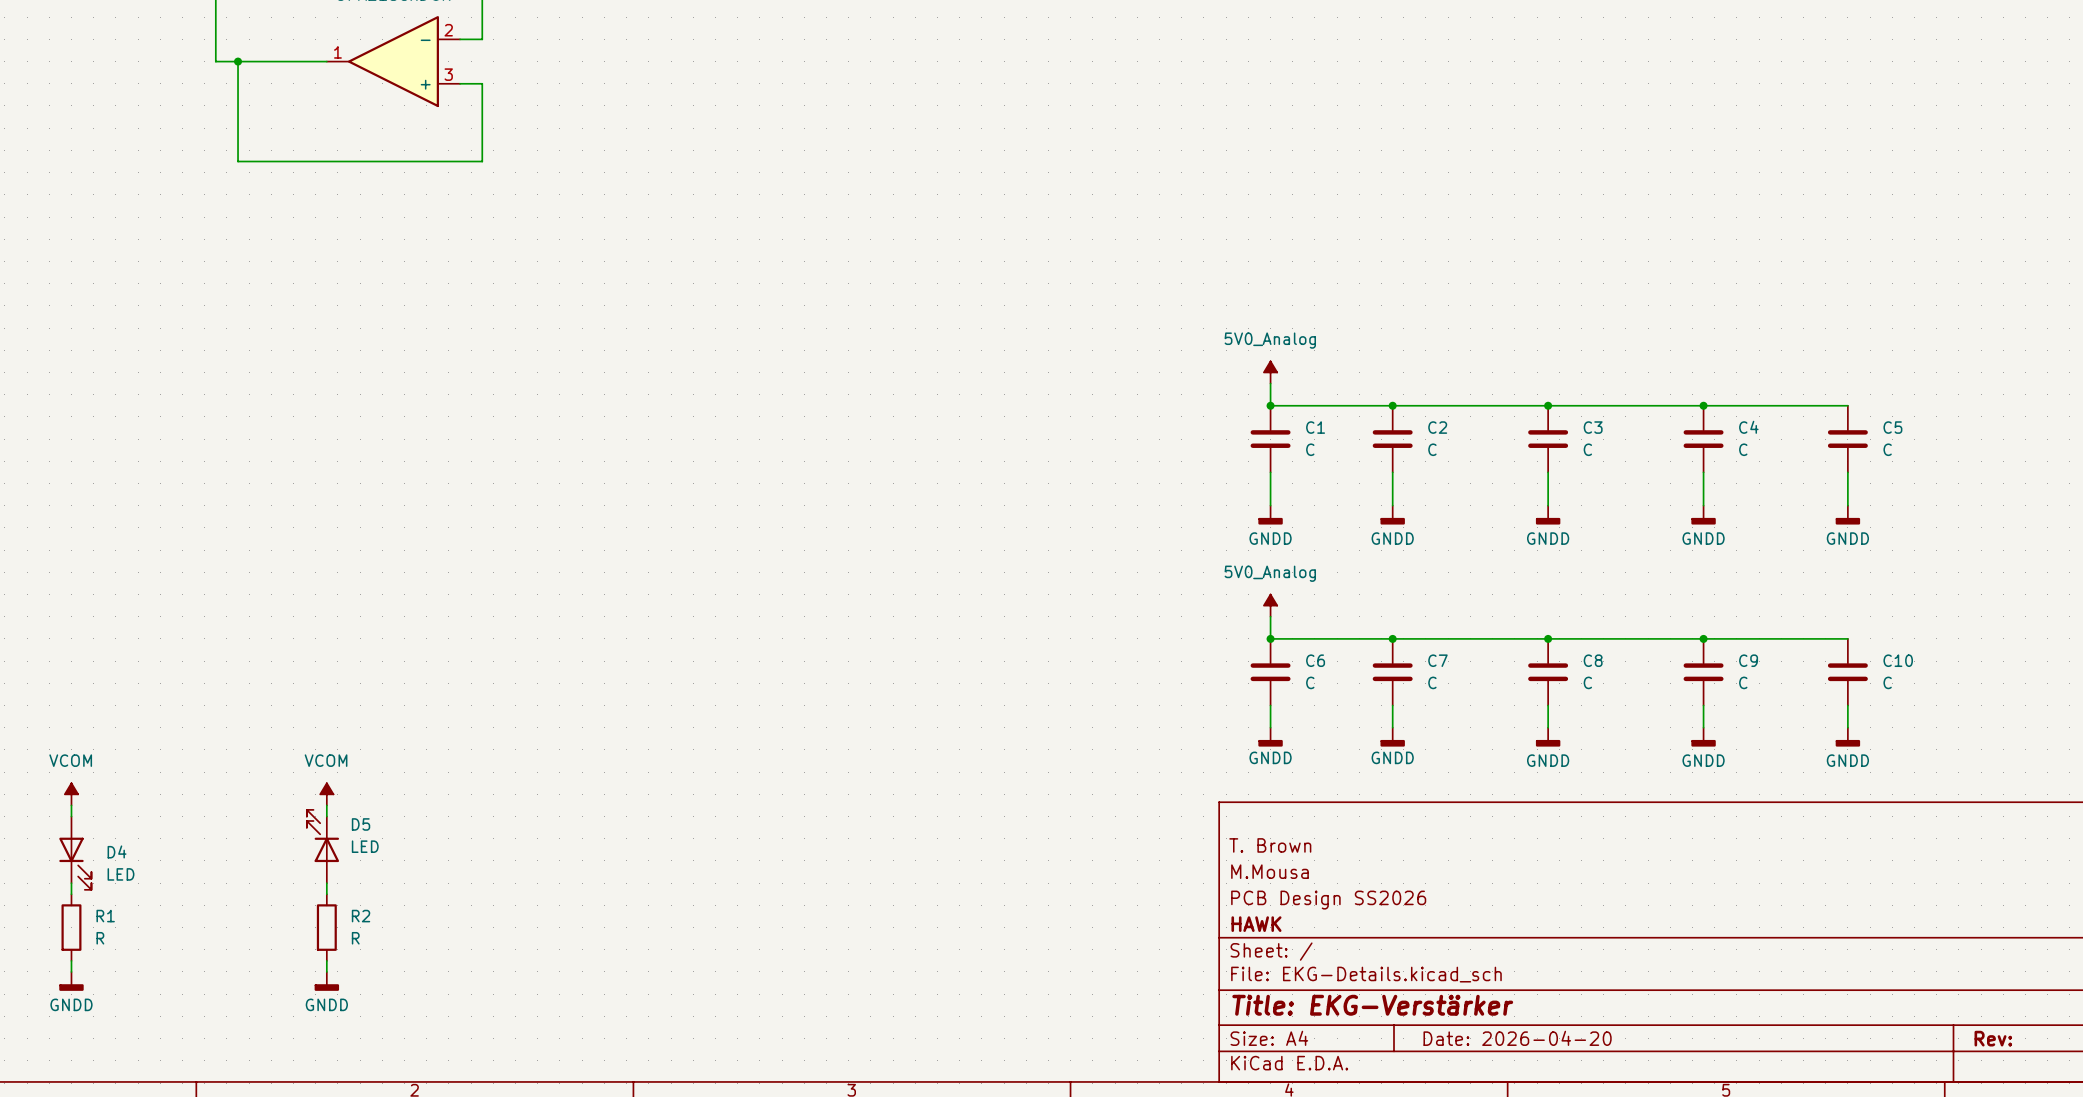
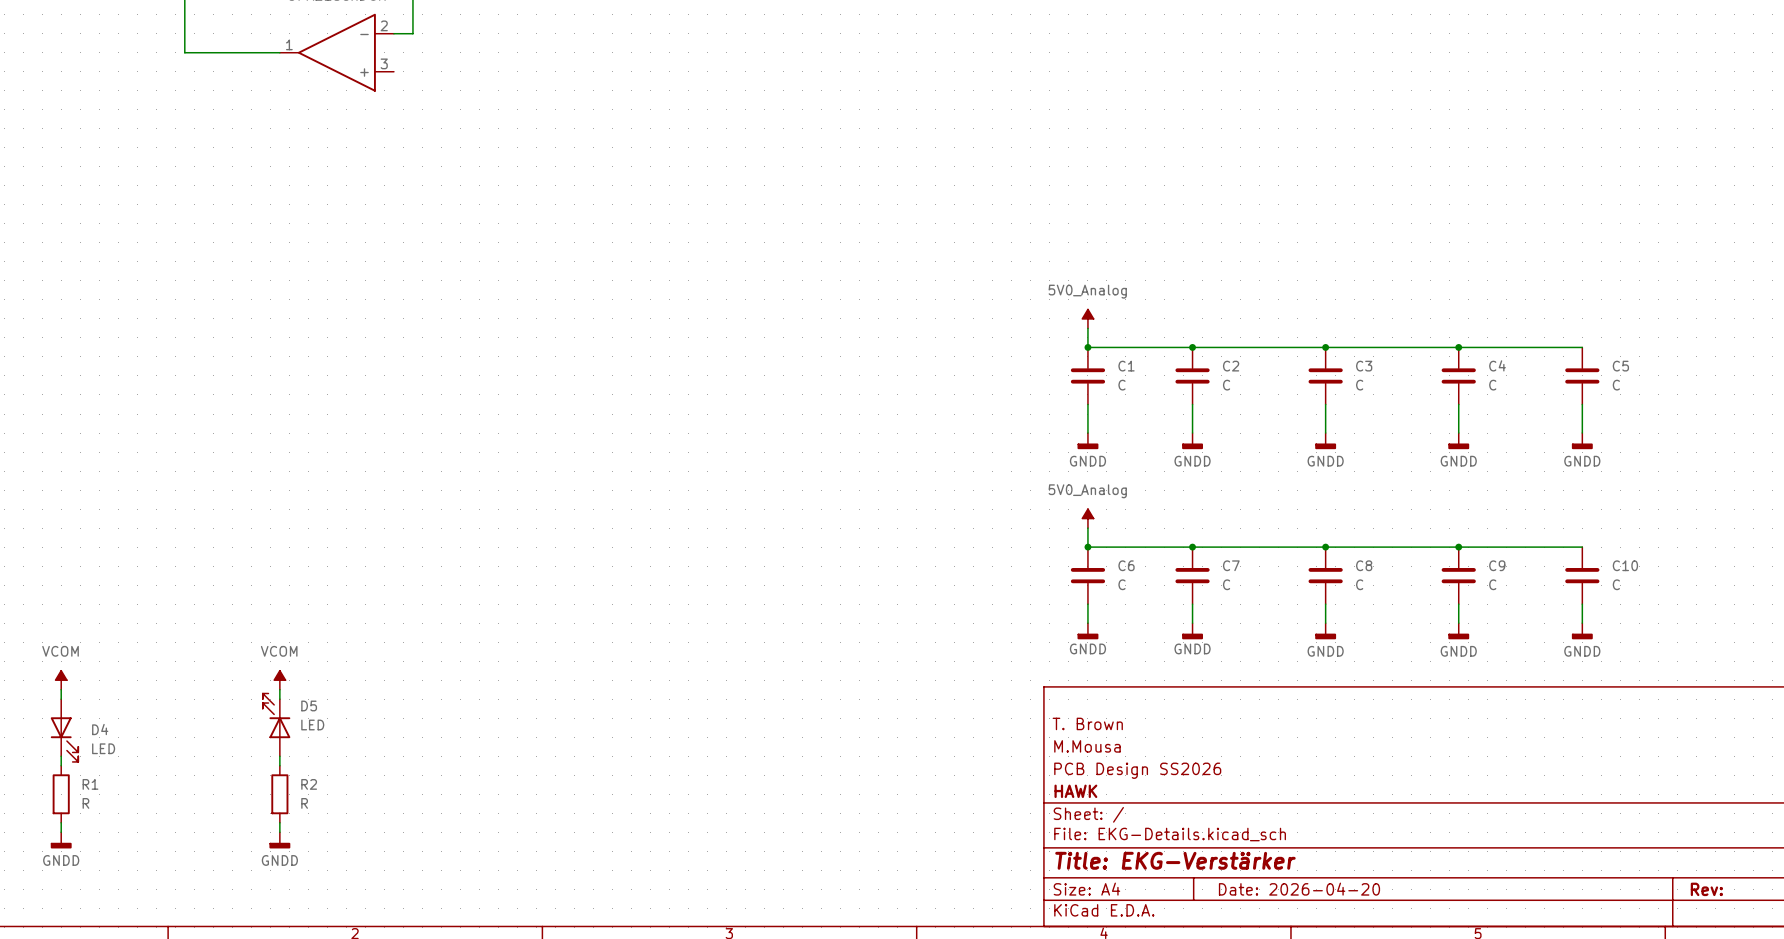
wire: (238, 61) (238, 161) (482, 161) (482, 83) (460, 83) -> none
junction: (238, 61) -> none

